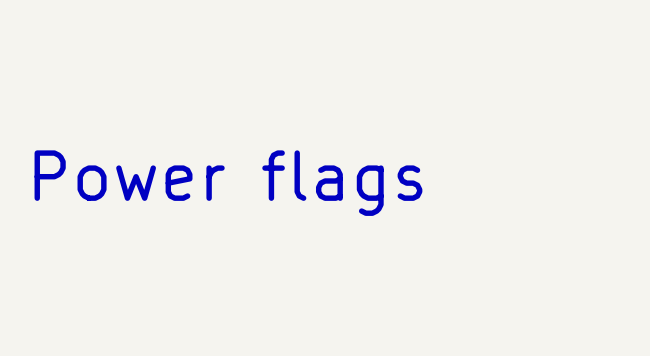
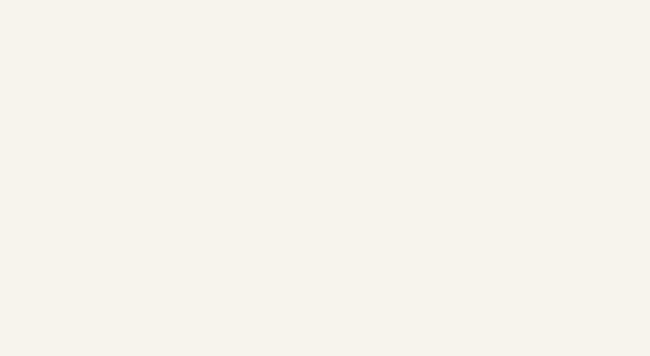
text: Power flags (228, 183) -> none

